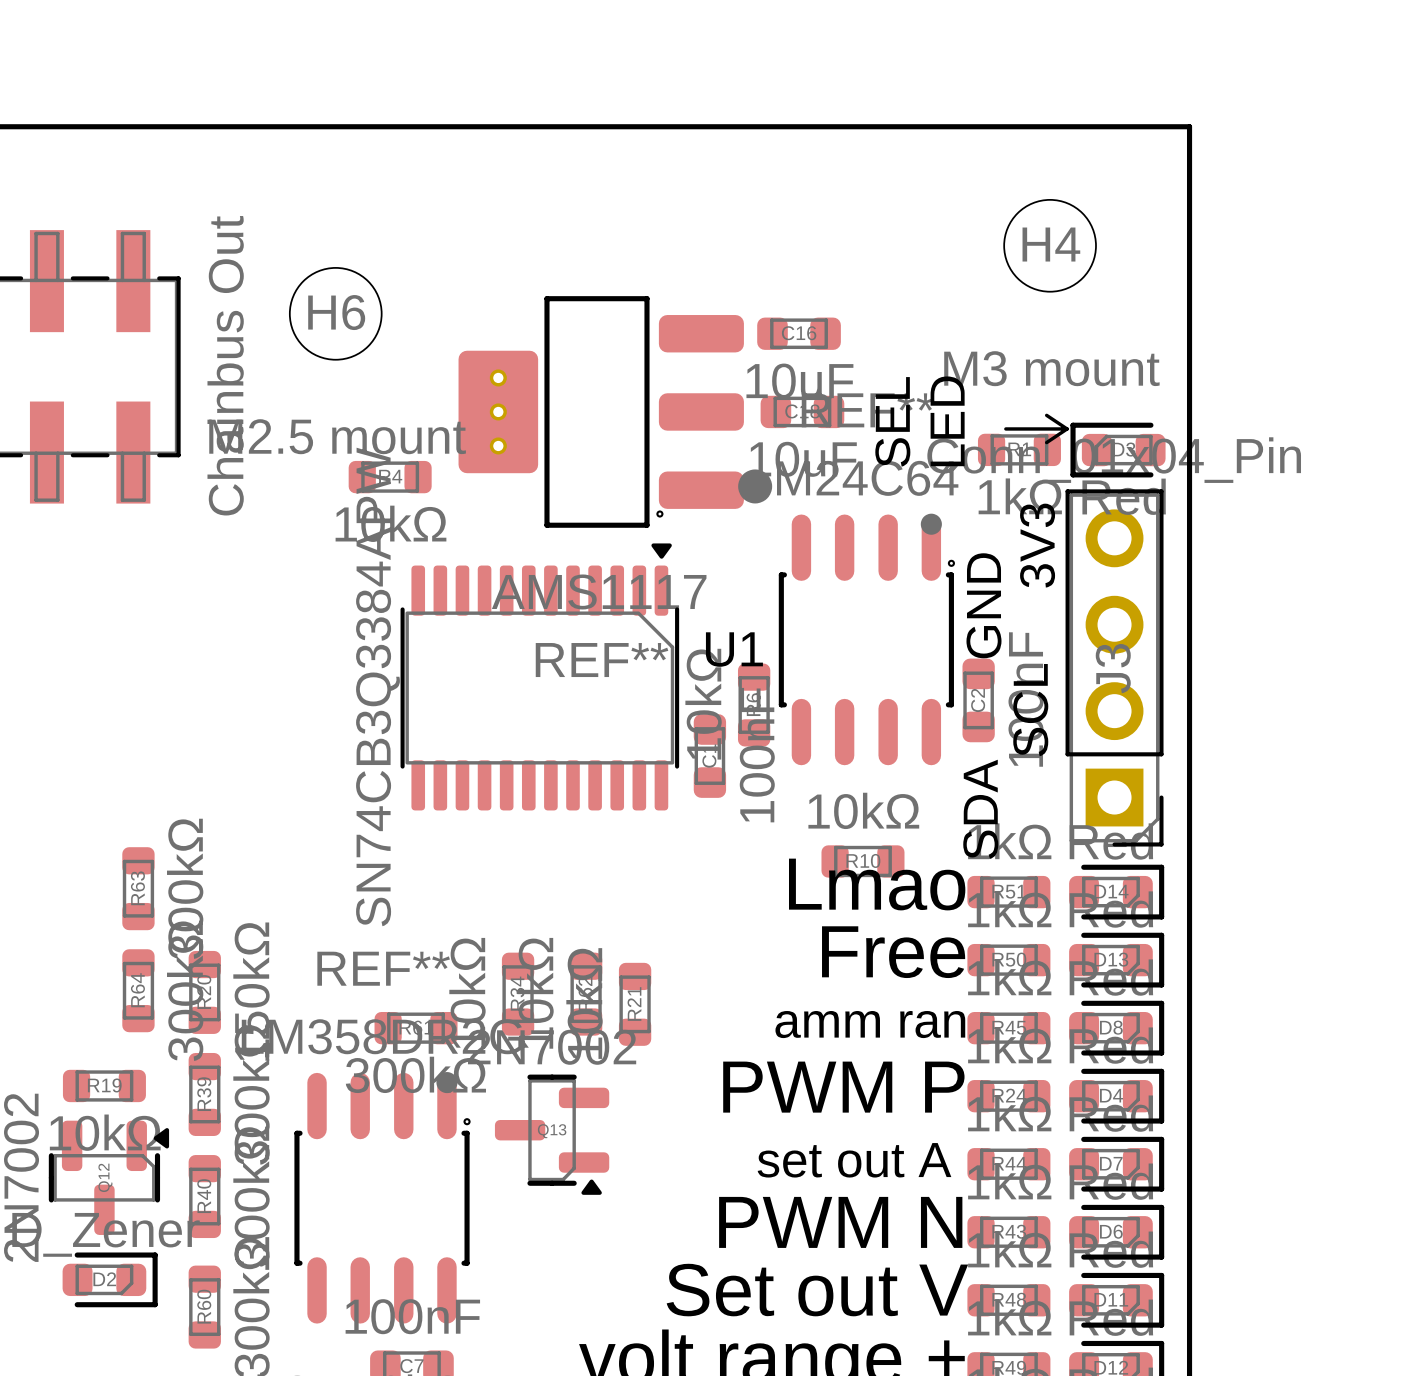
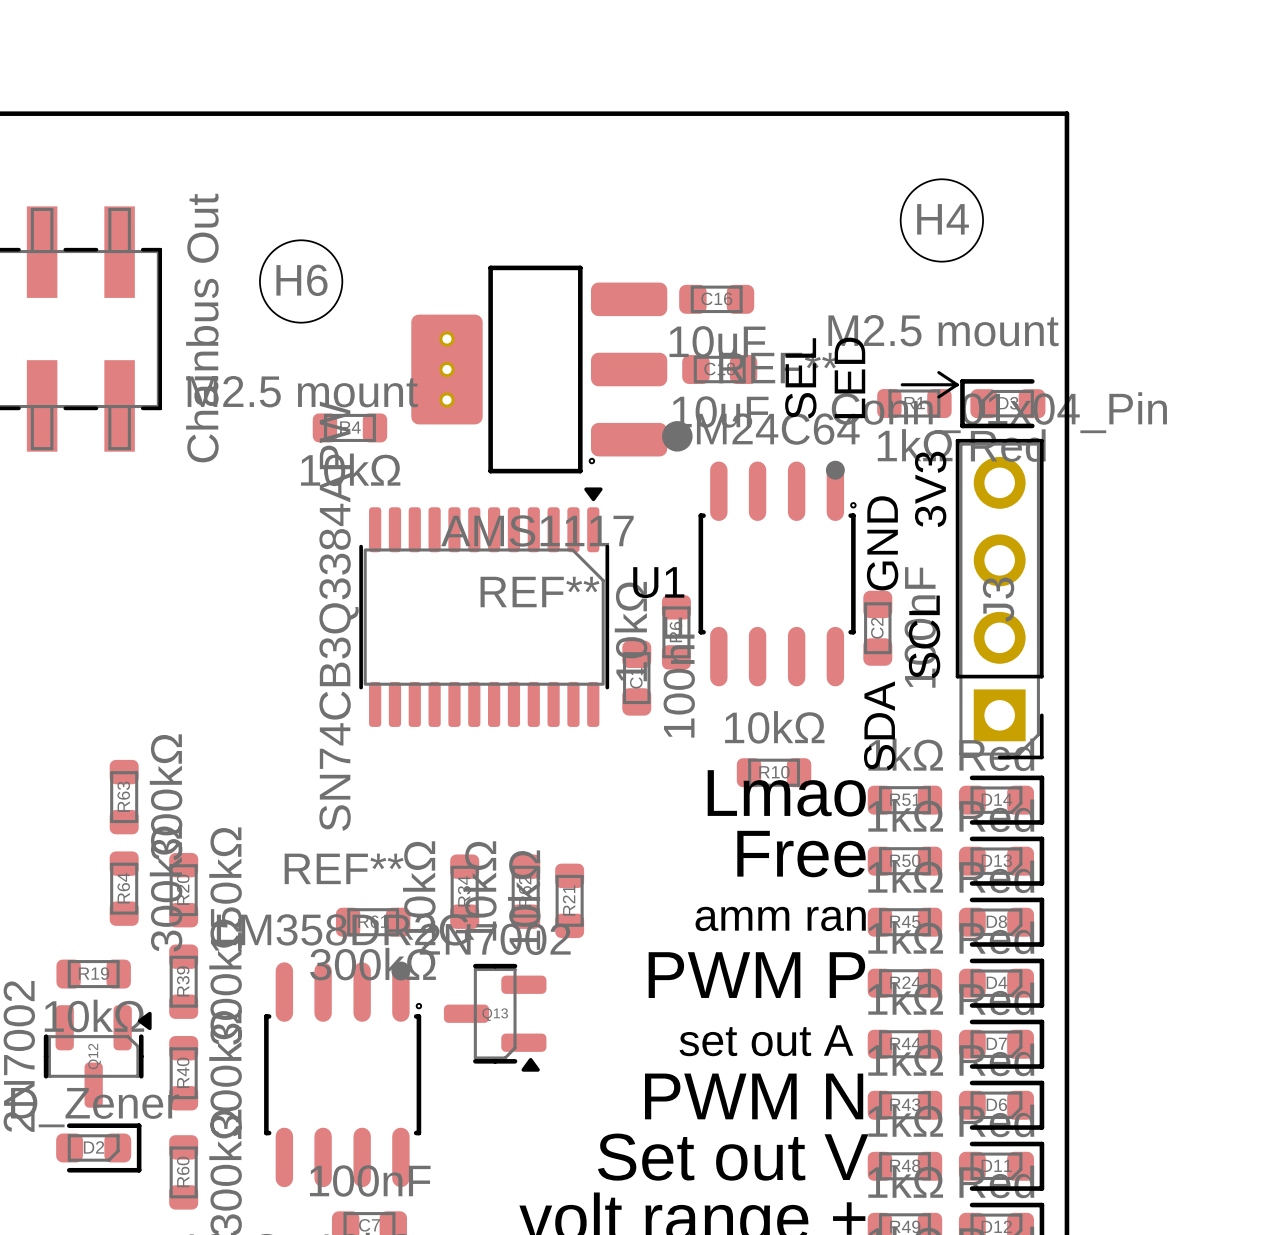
H4 value: M3 mount (1051, 368) -> M2.5 mount (943, 330)

